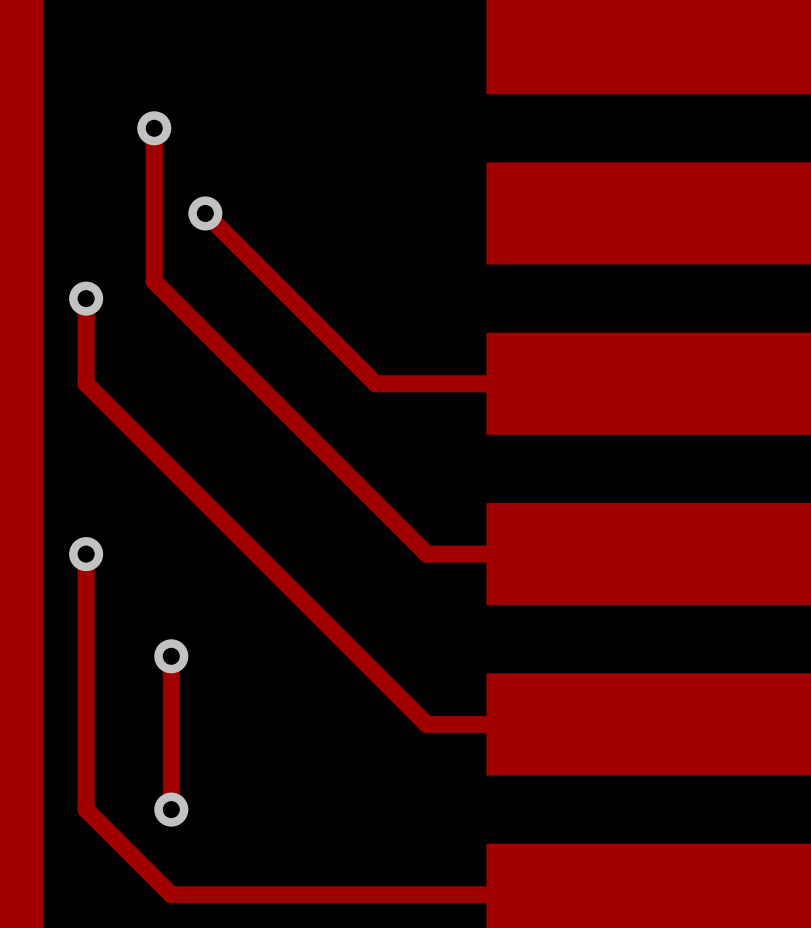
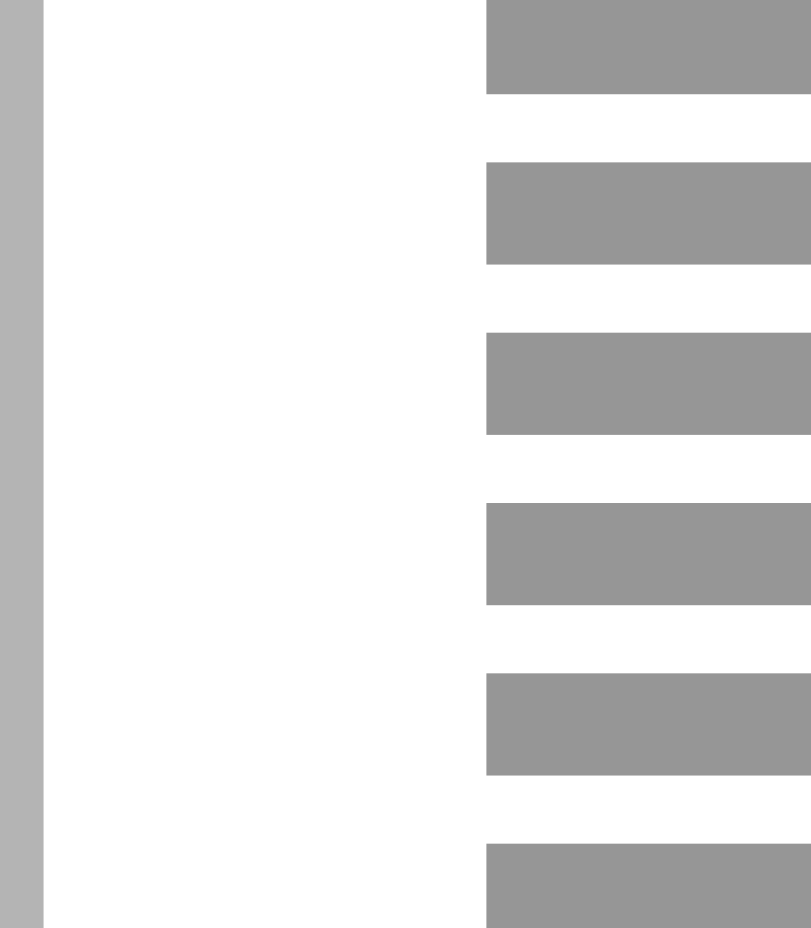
track: (154, 128) (154, 281) (426, 554) (486, 554) -> none
via: (154, 128) -> none
track: (205, 213) (375, 383) (486, 383) -> none
via: (205, 213) -> none
track: (86, 298) (86, 383) (426, 724) (486, 724) -> none
via: (86, 298) -> none
track: (86, 554) (86, 809) (171, 894) (486, 894) -> none
via: (86, 554) -> none
track: (171, 656) (171, 809) -> none
via: (171, 656) -> none
via: (171, 809) -> none

